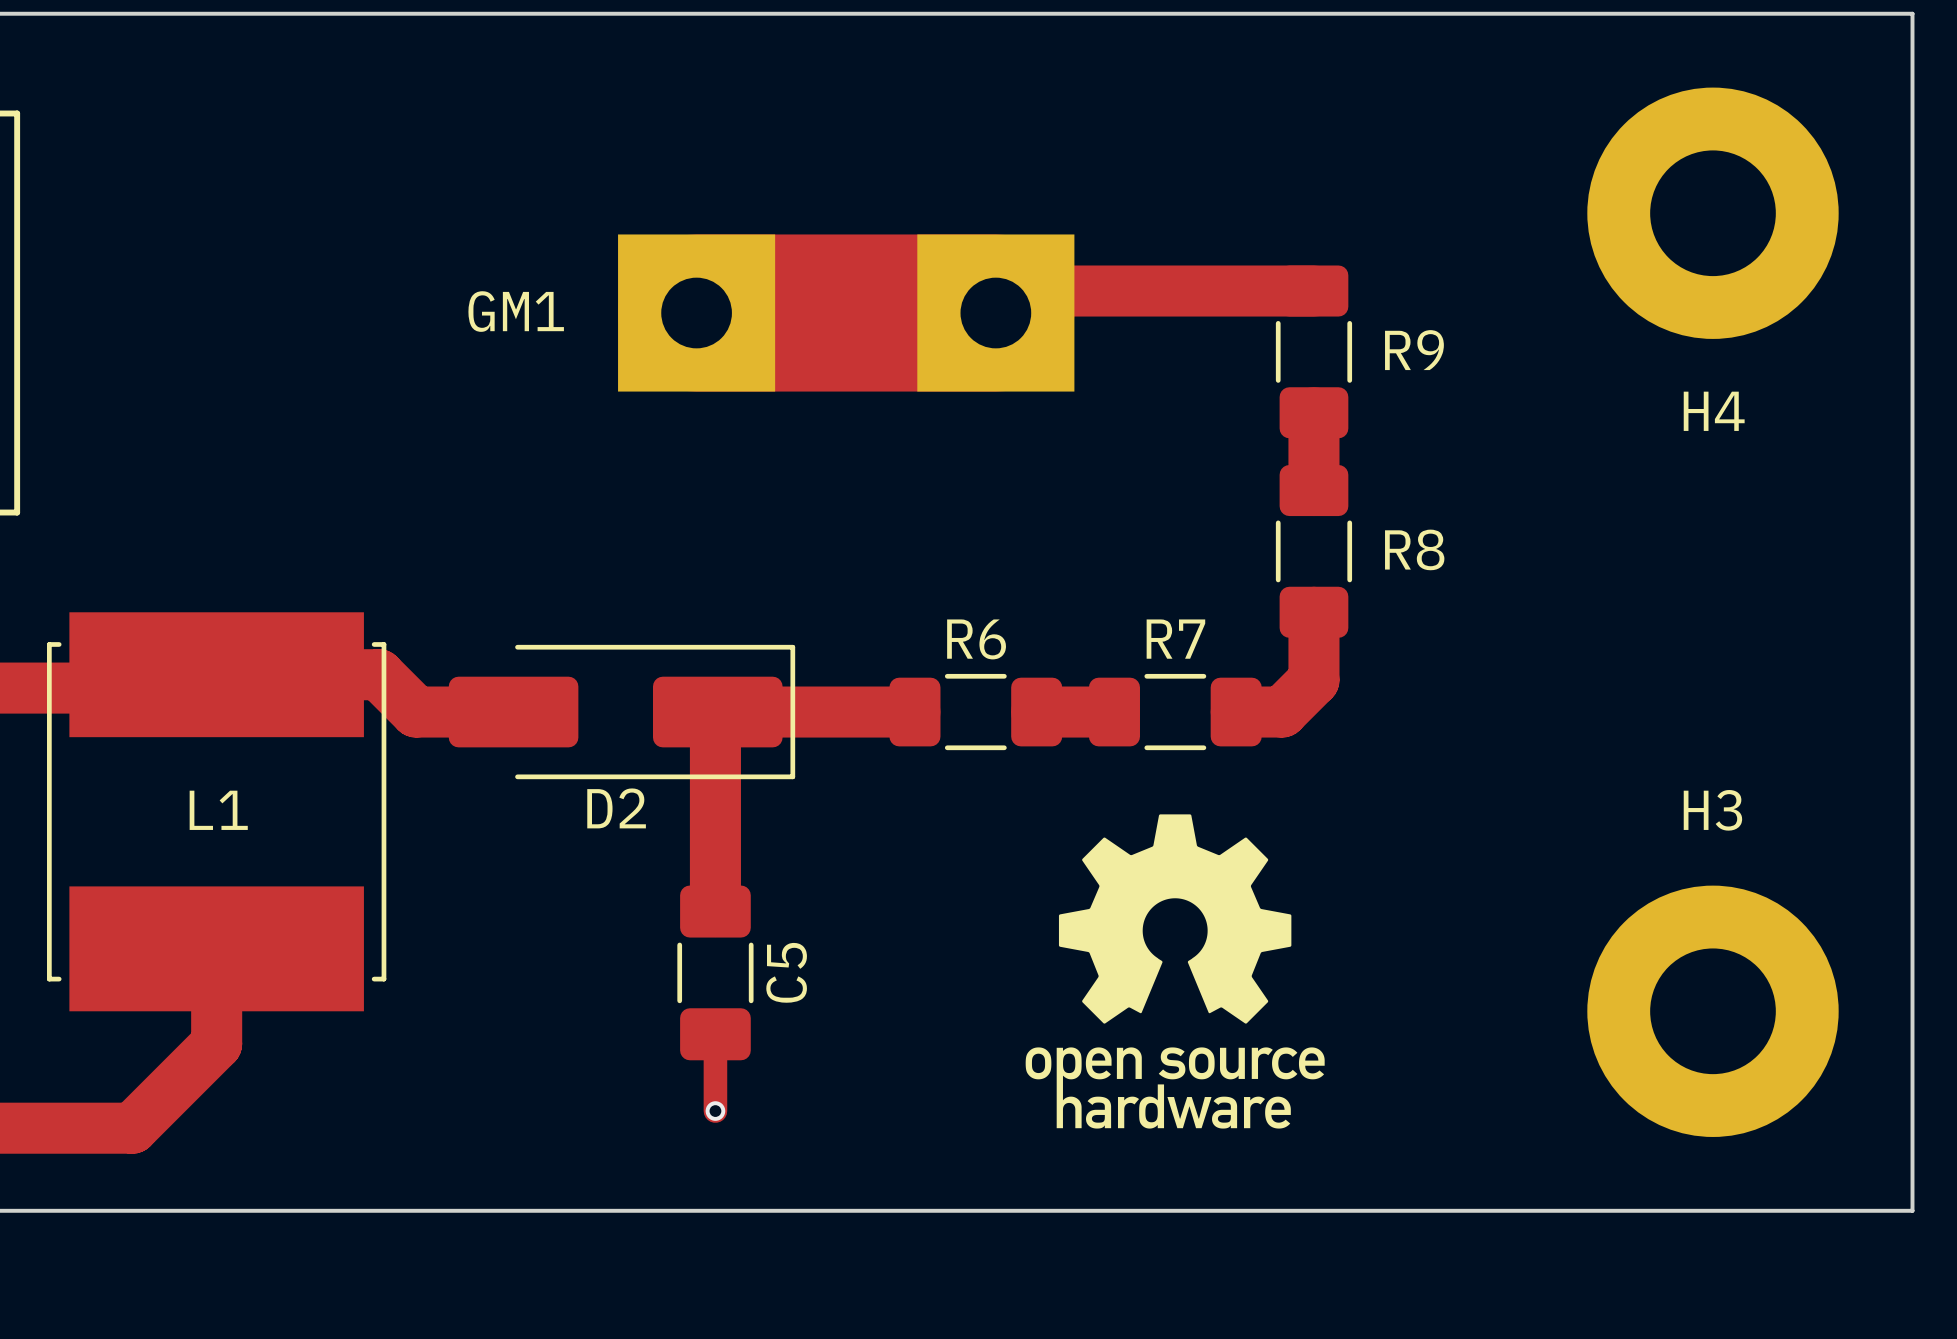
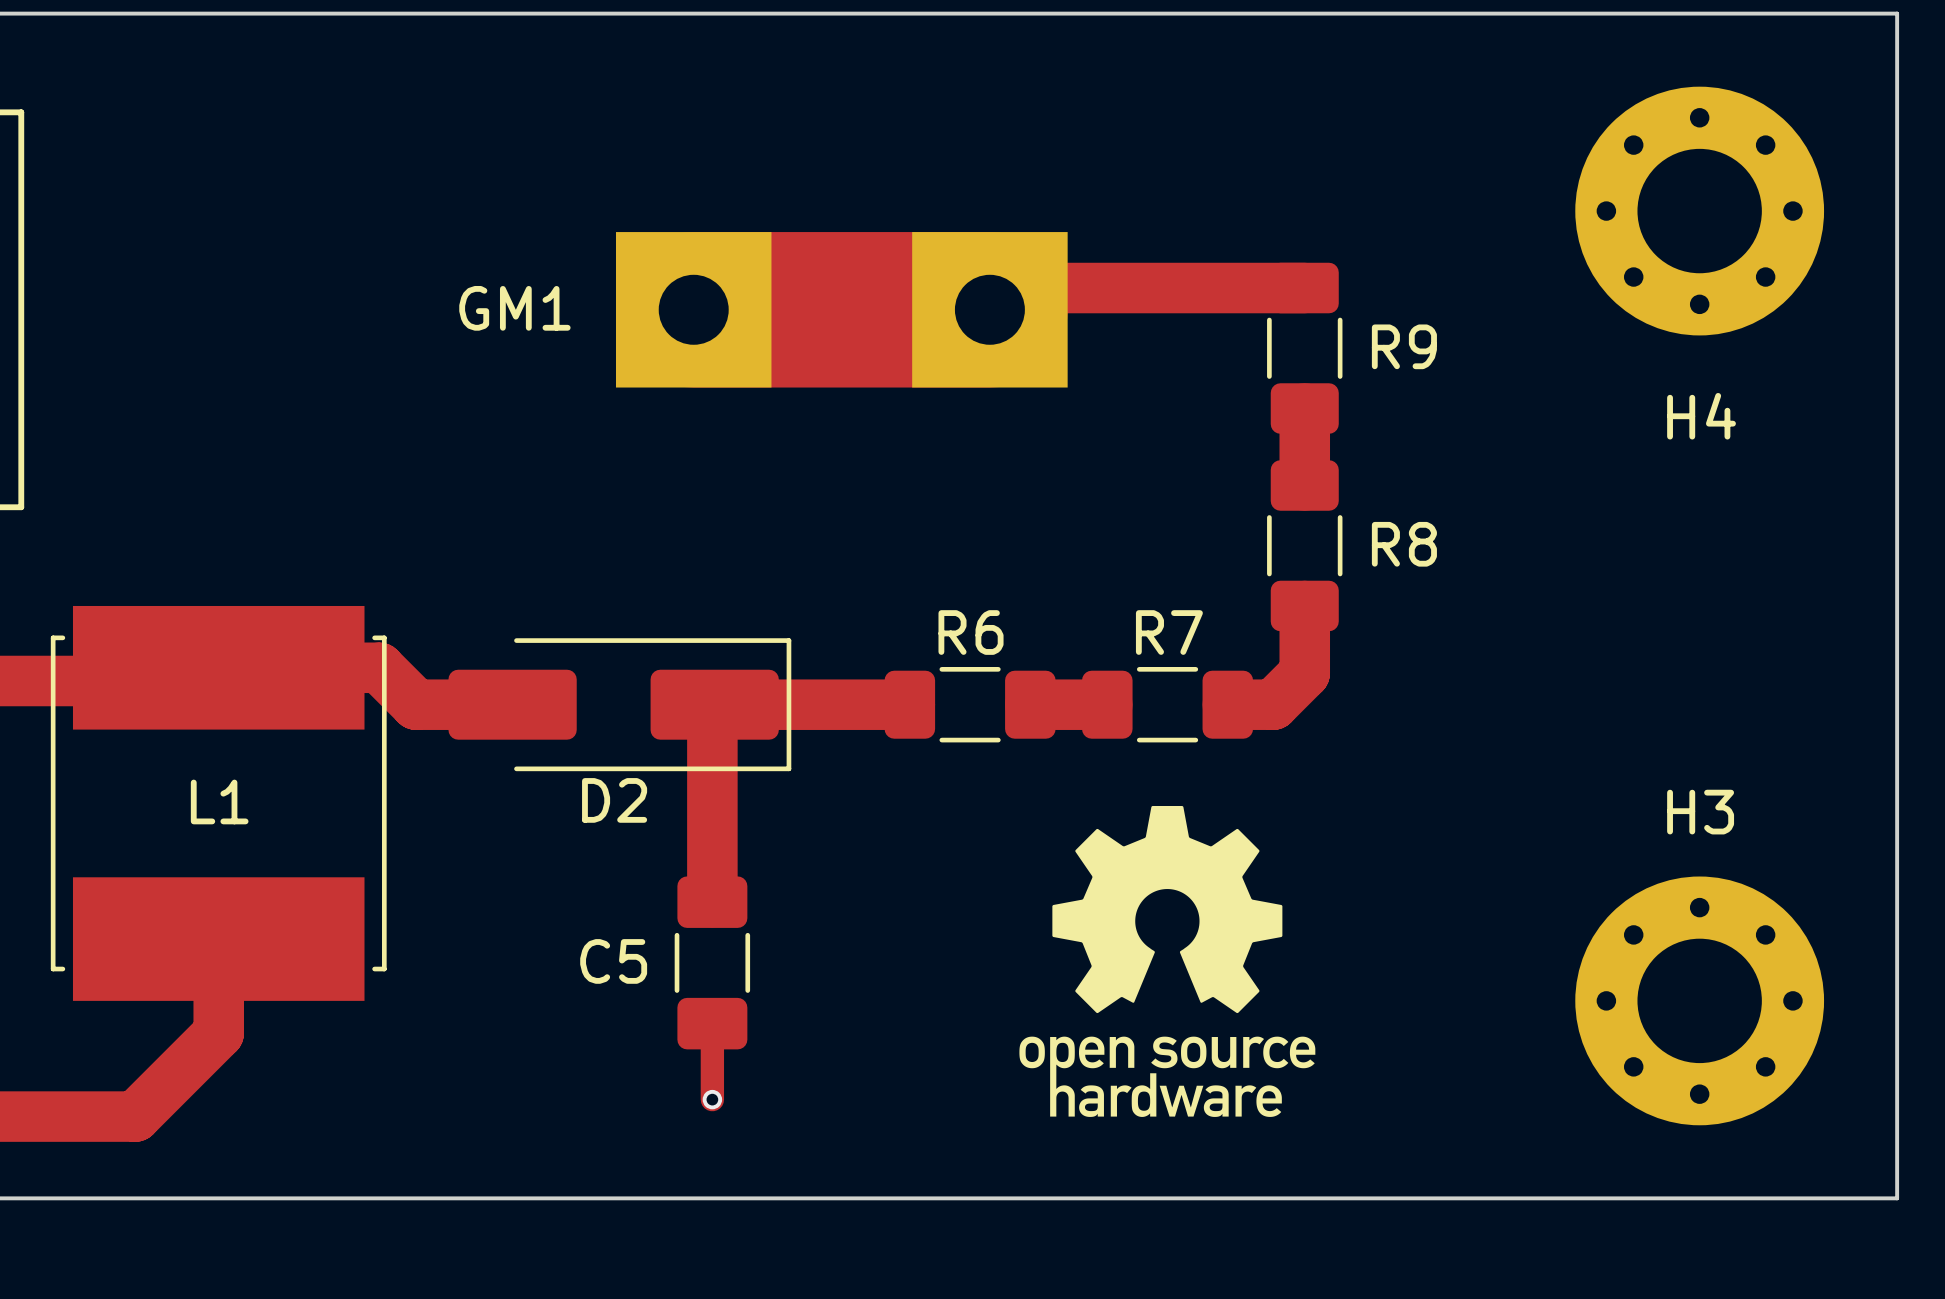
H4 footprint: [1587, 87, 1839, 339] -> [1575, 86, 1825, 336]
H3 footprint: [1587, 885, 1839, 1137] -> [1575, 876, 1825, 1126]
C5 name rotation: 0° (786, 972) -> 90° clockwise (613, 961)
C5 name position: C5 (786, 972) -> C5 (613, 961)

